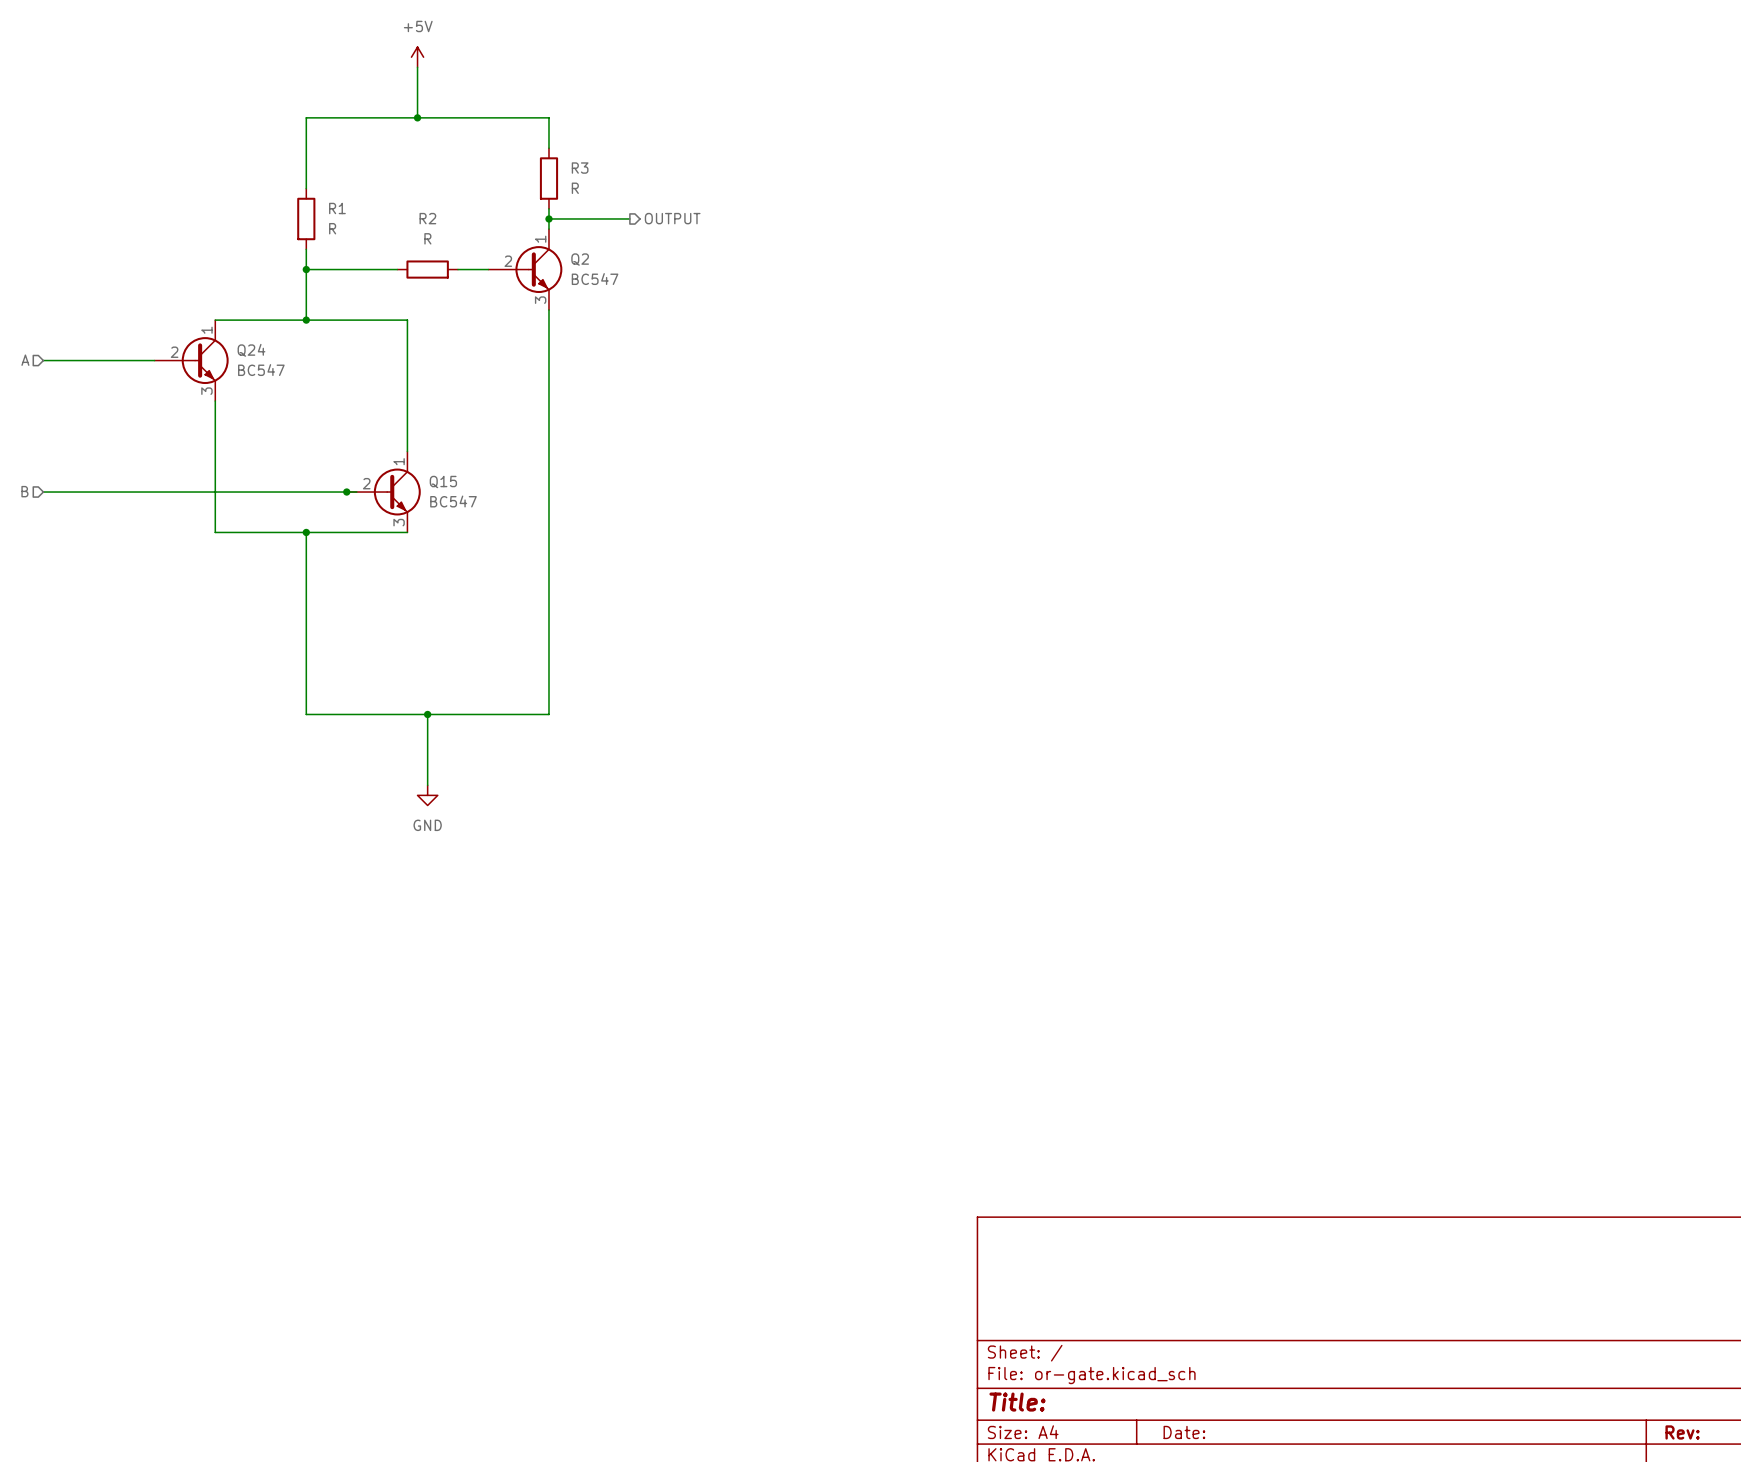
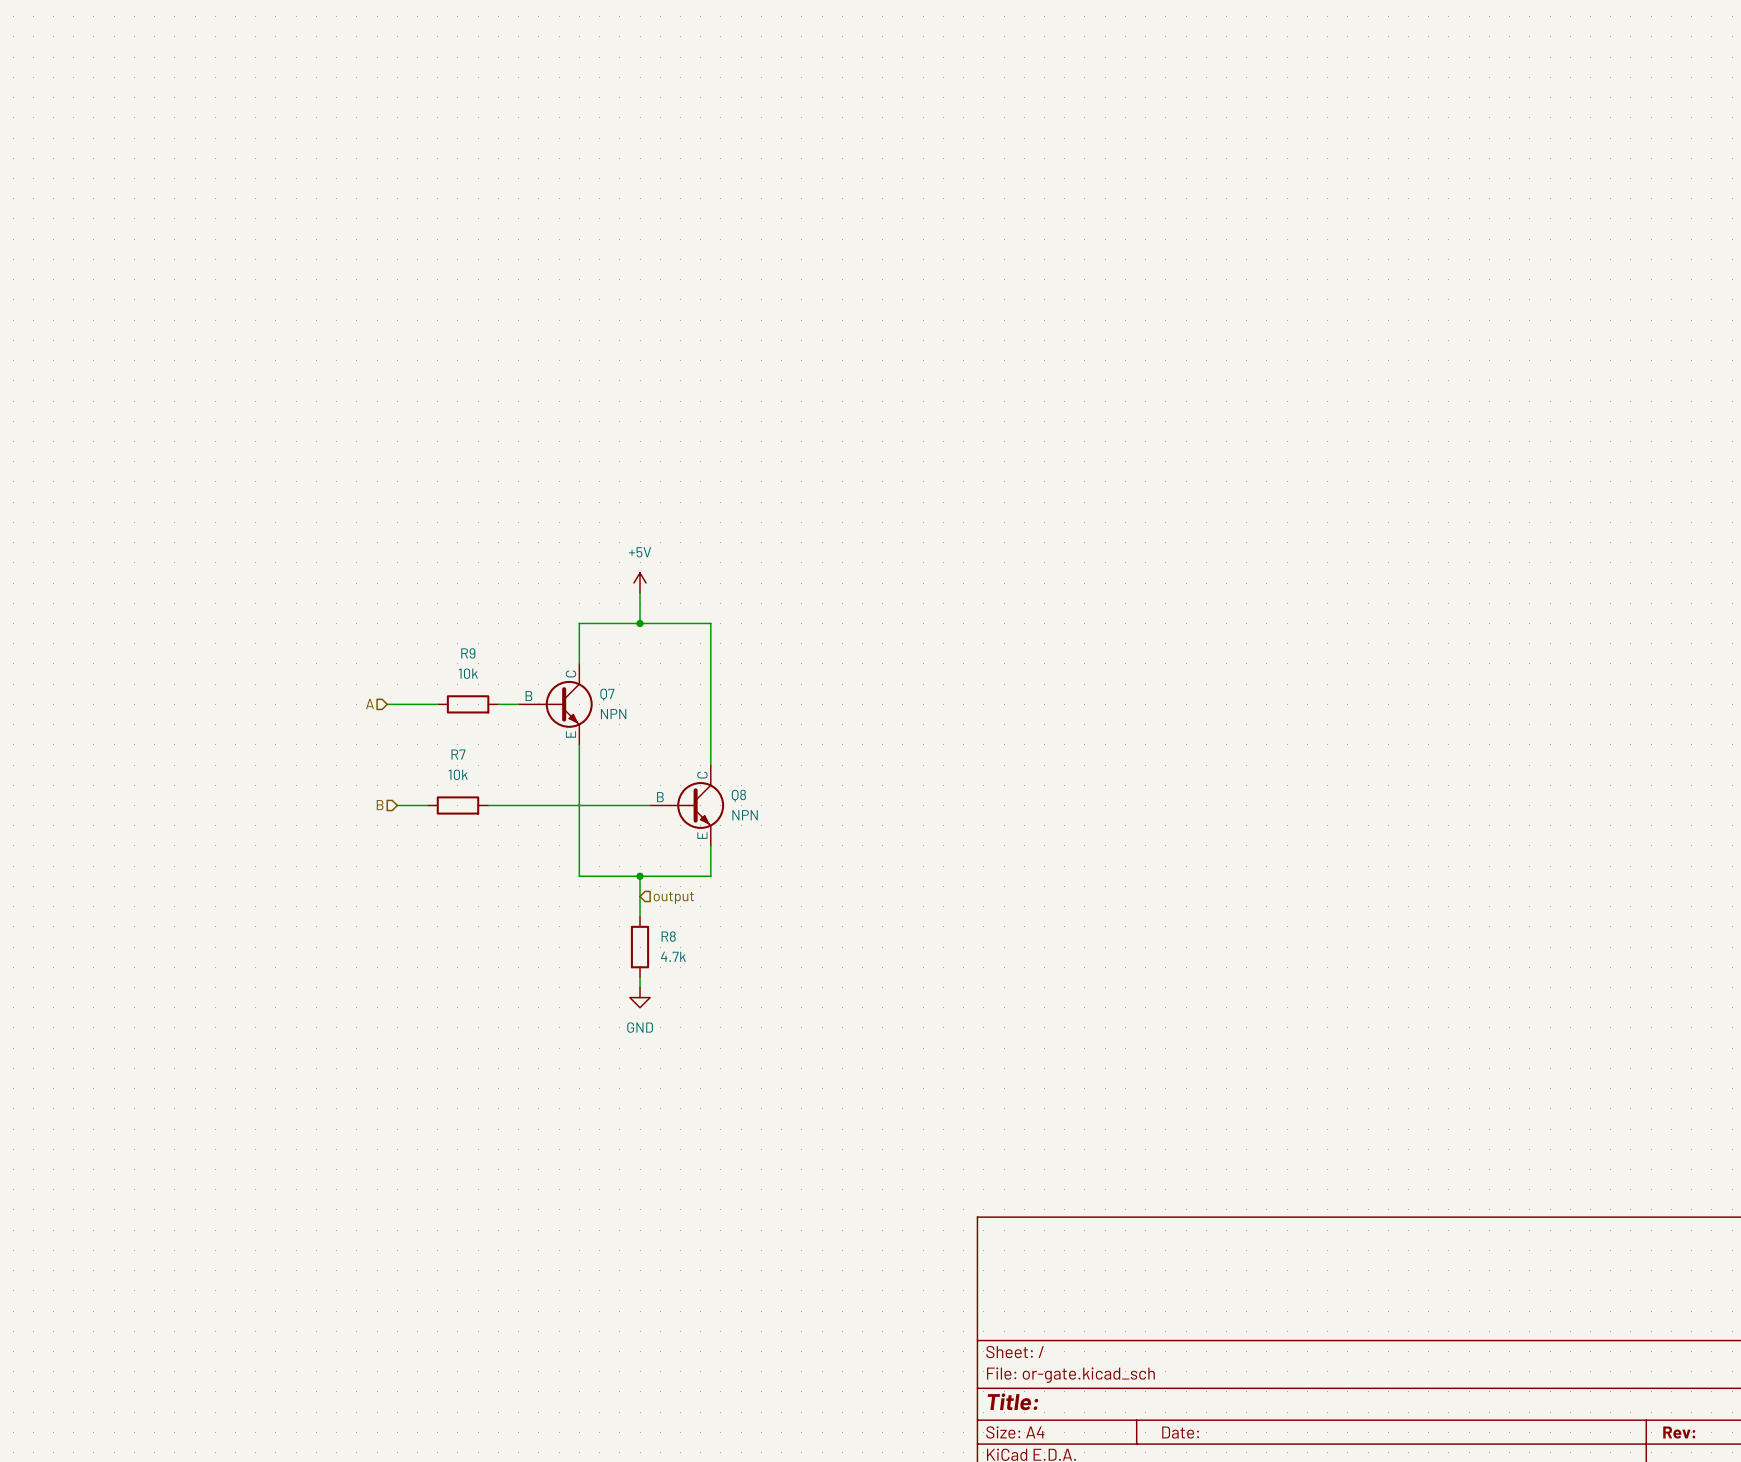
power symbol: +5V (417, 57) -> none
wire: (417, 67) (417, 117) -> none
junction: (417, 117) -> none
wire: (548, 148) (548, 117) (306, 117) (306, 188) -> none
R3: R (548, 178) -> none
wire: (548, 208) (548, 229) -> none
R1: R (306, 218) -> none
wire: (548, 218) (629, 218) -> none
junction: (548, 218) -> none
hierarchical label: OUTPUT (672, 218) -> none
wire: (306, 249) (306, 320) -> none
wire: (306, 269) (397, 269) -> none
junction: (306, 269) -> none
R2: R (427, 269) -> none
wire: (457, 269) (488, 269) -> none
Q2: BC547 (525, 269) -> none
wire: (548, 309) (548, 714) (306, 714) (306, 532) -> none
wire: (215, 320) (407, 320) (407, 451) -> none
junction: (306, 320) -> none
hierarchical label: A (25, 360) -> none
wire: (43, 360) (154, 360) -> none
Q24: BC547 (191, 360) -> none
wire: (215, 401) (215, 532) (407, 532) -> none
hierarchical label: B (24, 491) -> none
wire: (43, 492) (356, 492) -> none
junction: (346, 492) -> none
Q15: BC547 (383, 492) -> none
junction: (306, 532) -> none
power symbol: none -> +5V (640, 583)
wire: none -> (640, 593) (640, 623)
junction: none -> (640, 623)
wire: none -> (579, 663) (579, 623) (710, 623) (710, 765)
hierarchical label: none -> A (369, 703)
wire: none -> (387, 704) (437, 704)
R9: none -> 10k (468, 704)
wire: none -> (498, 704) (518, 704)
Q7: none -> NPN (555, 704)
wire: (427, 714) (427, 785) -> none
junction: (427, 714) -> none
wire: none -> (579, 744) (579, 876) (710, 876) (710, 845)
power symbol: GND (427, 795) -> none
hierarchical label: none -> B (380, 805)
wire: none -> (397, 805) (427, 805)
R7: none -> 10k (457, 805)
wire: none -> (488, 805) (650, 805)
Q8: none -> NPN (687, 805)
wire: none -> (640, 876) (640, 916)
junction: none -> (640, 876)
hierarchical label: none -> output (673, 897)
R8: none -> 4.7k (640, 947)
wire: none -> (640, 977) (640, 987)
power symbol: none -> GND (640, 997)

